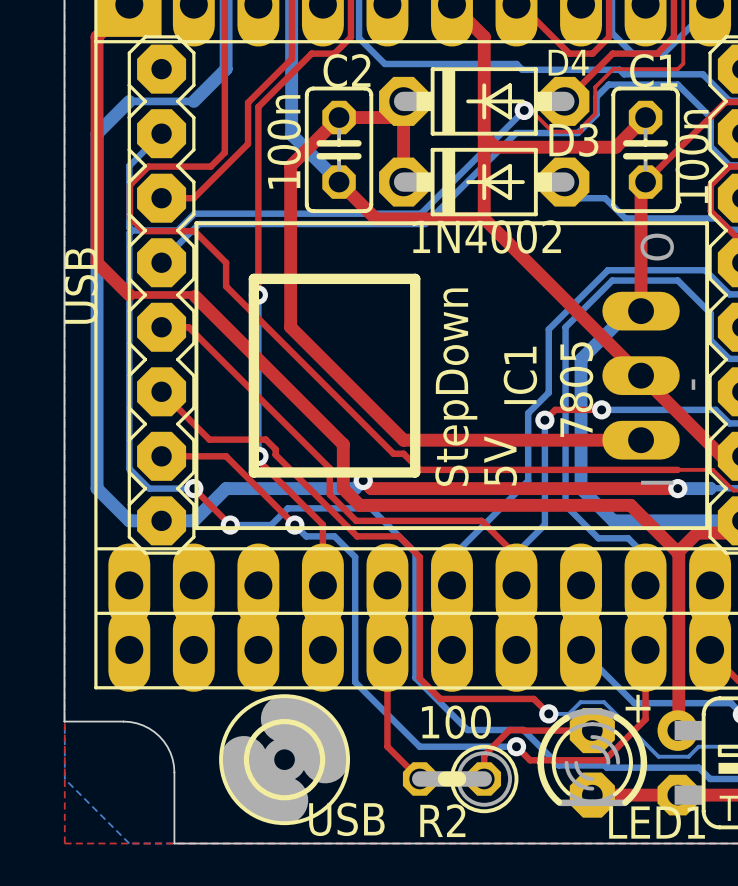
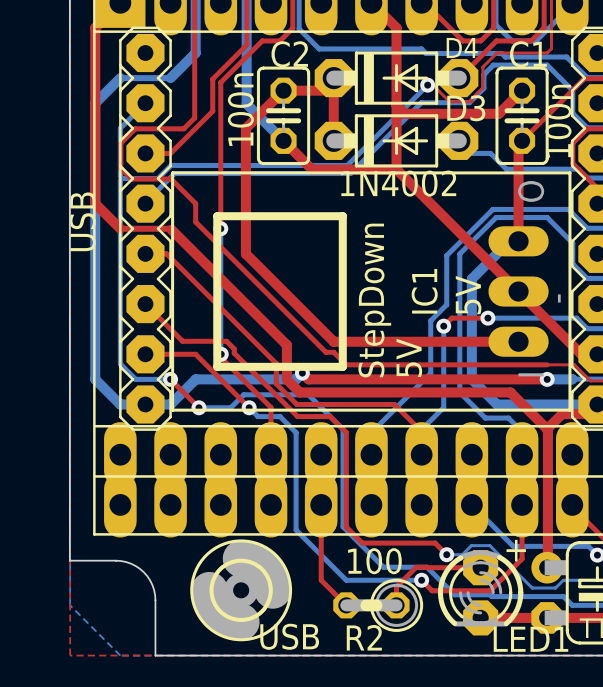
IC1 value: 7805 (576, 389) -> 5V (468, 295)

